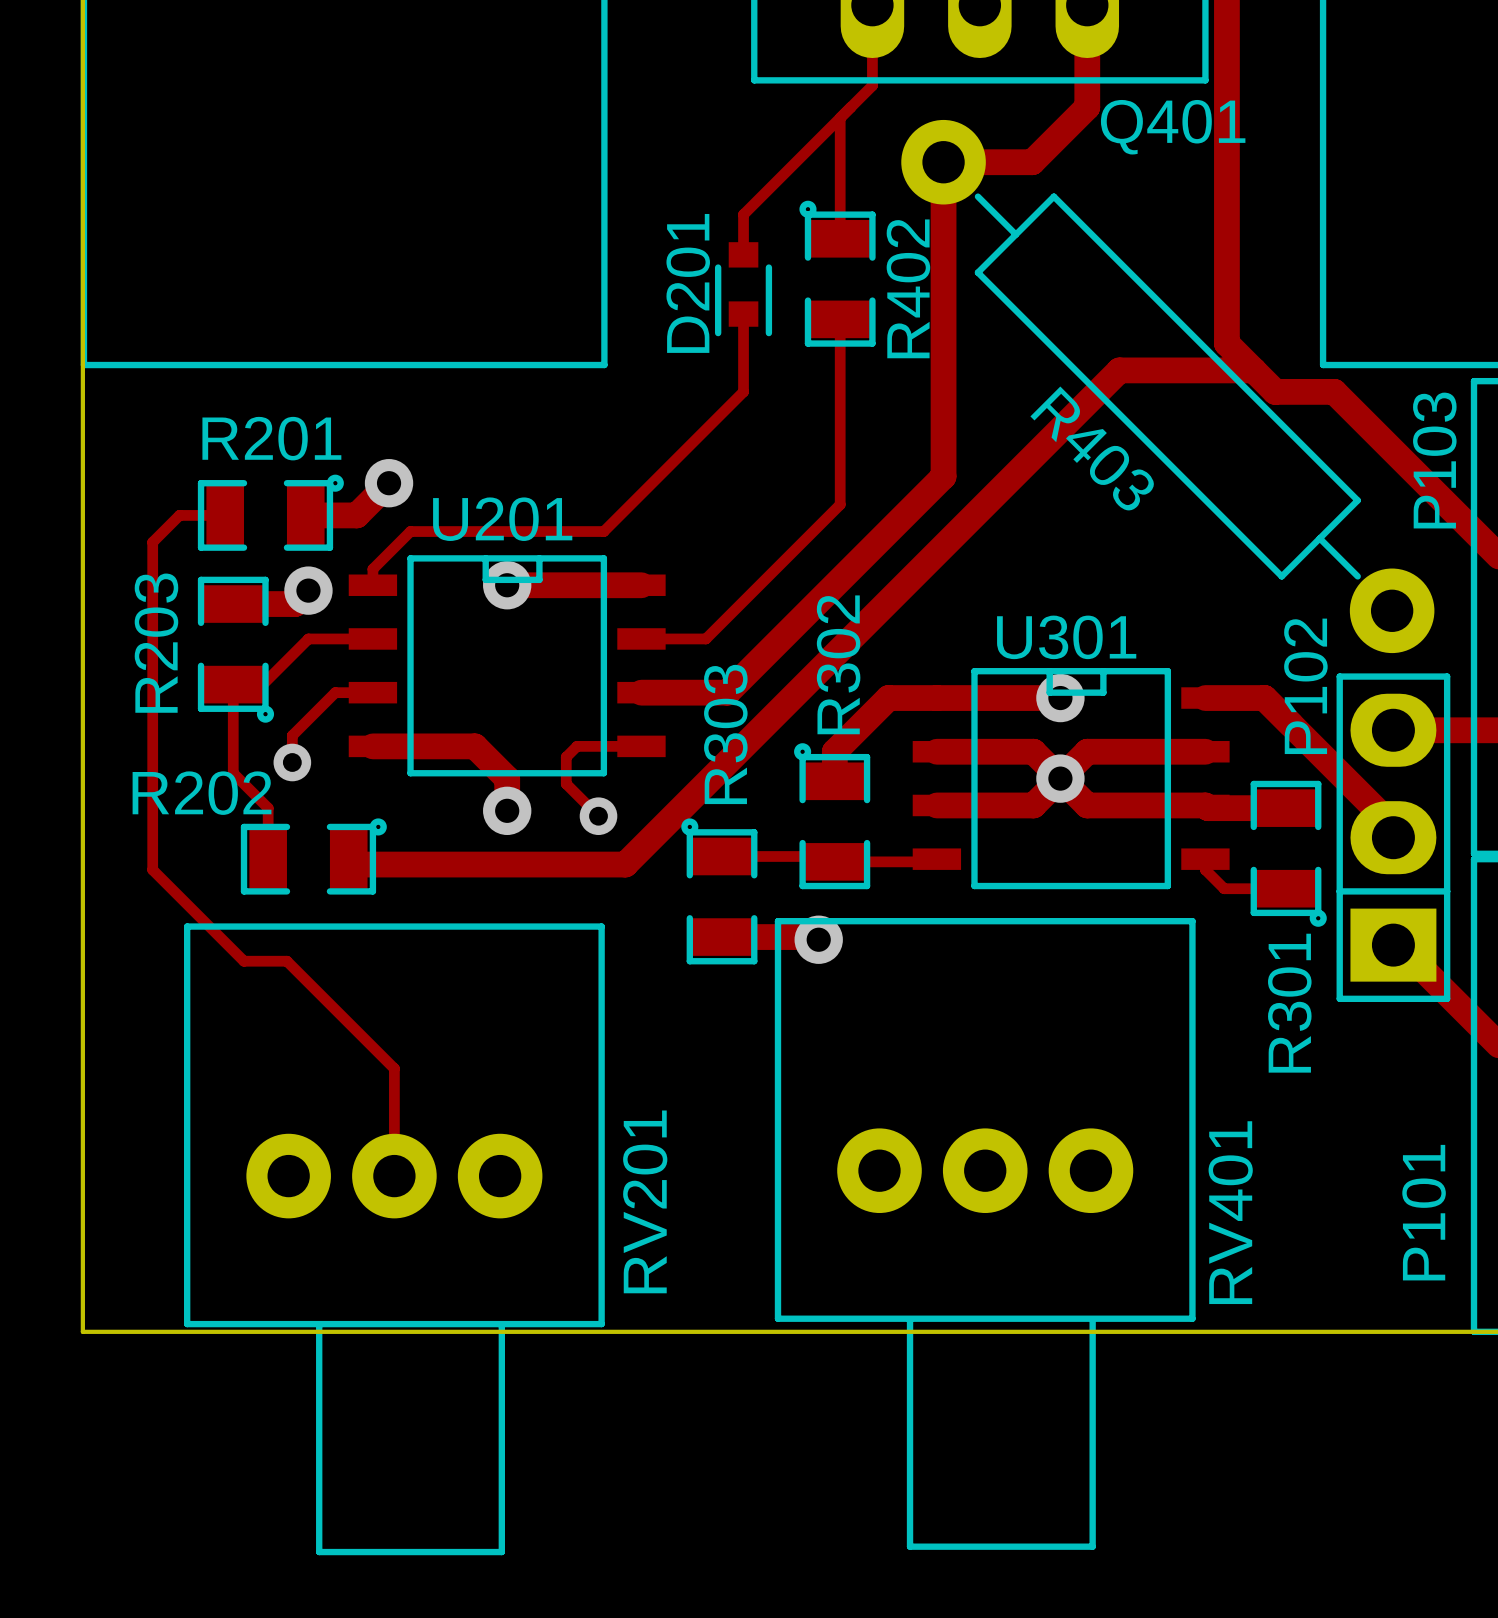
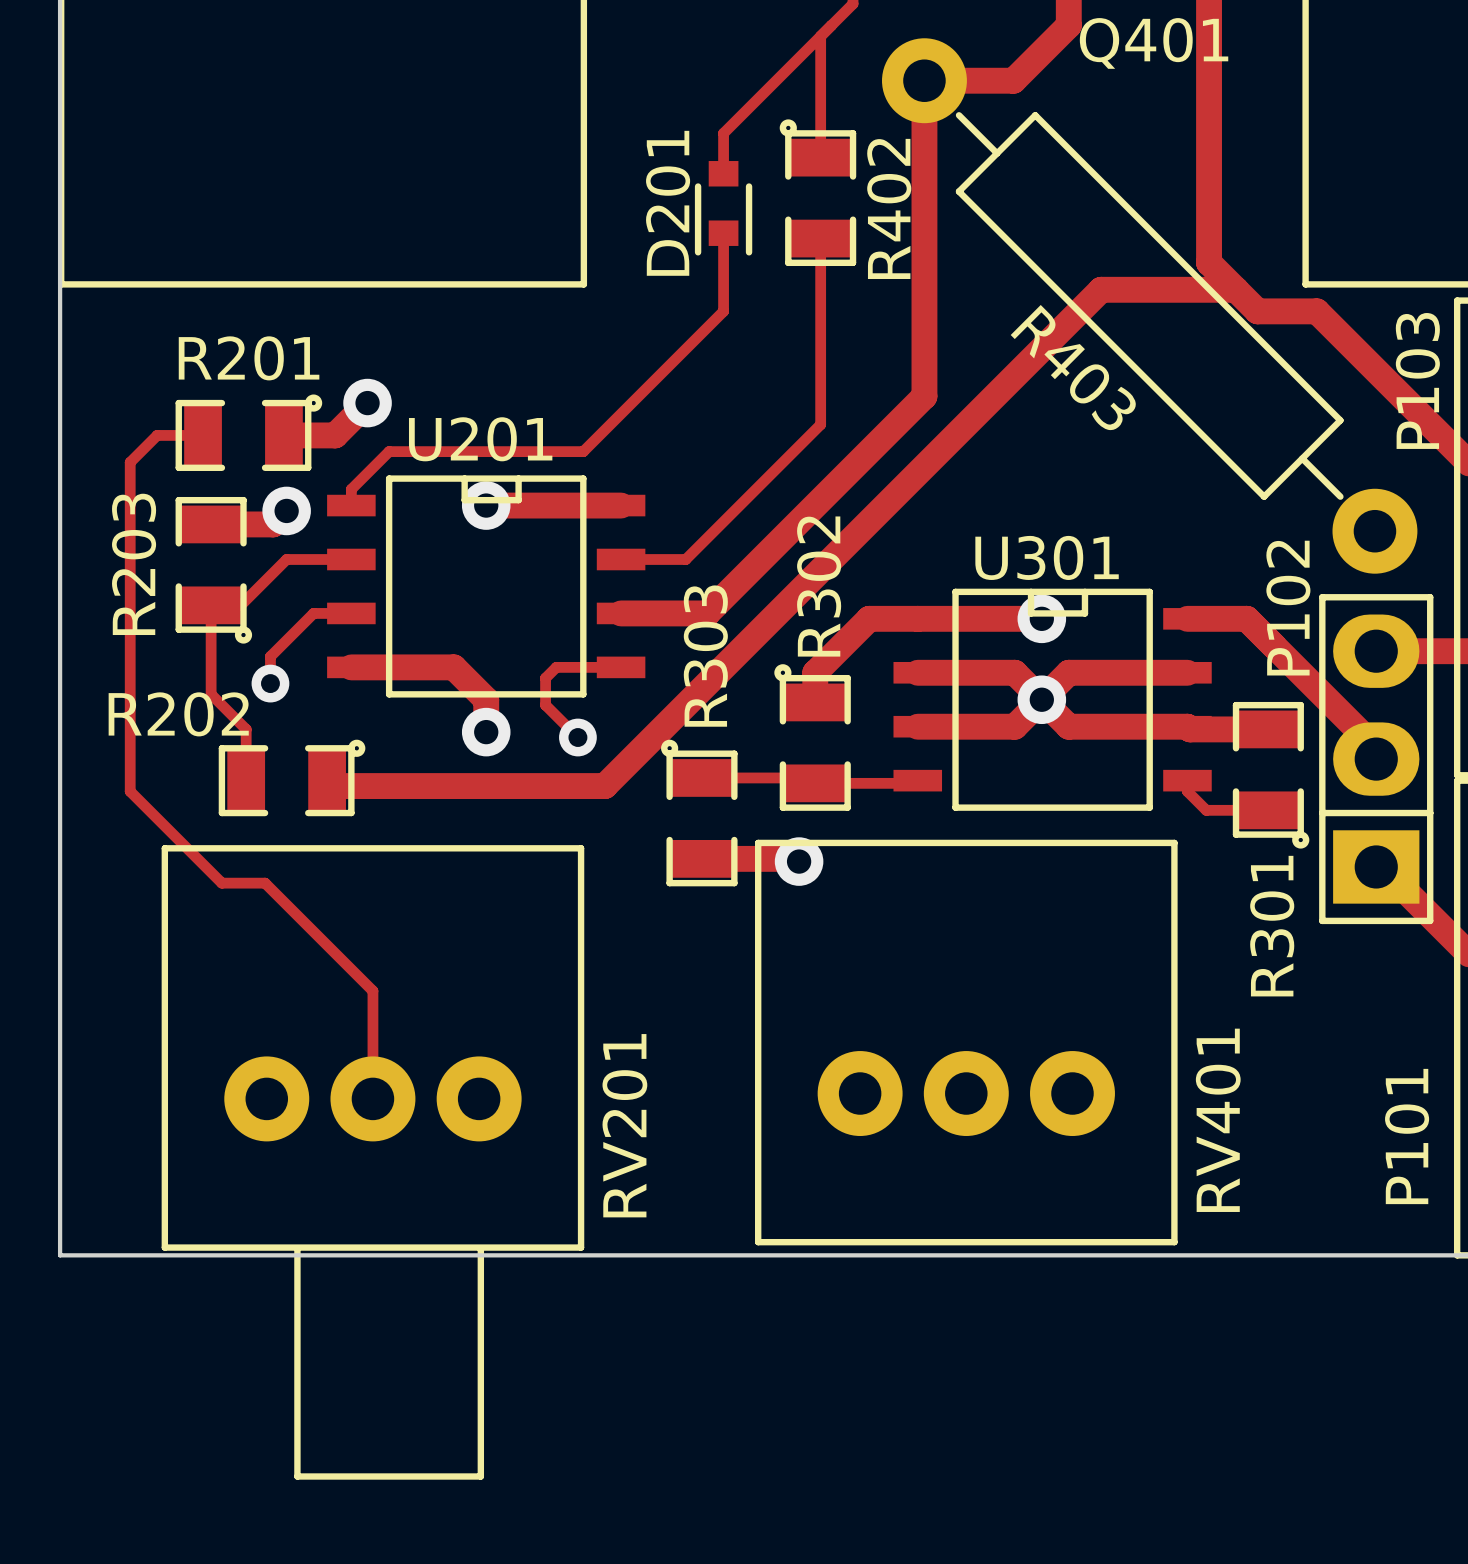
RV401 footprint: [727, 918, 1244, 1550] -> [707, 839, 1226, 1246]
RV401 name position: RV401 (1230, 1212) -> RV401 (1218, 1120)

